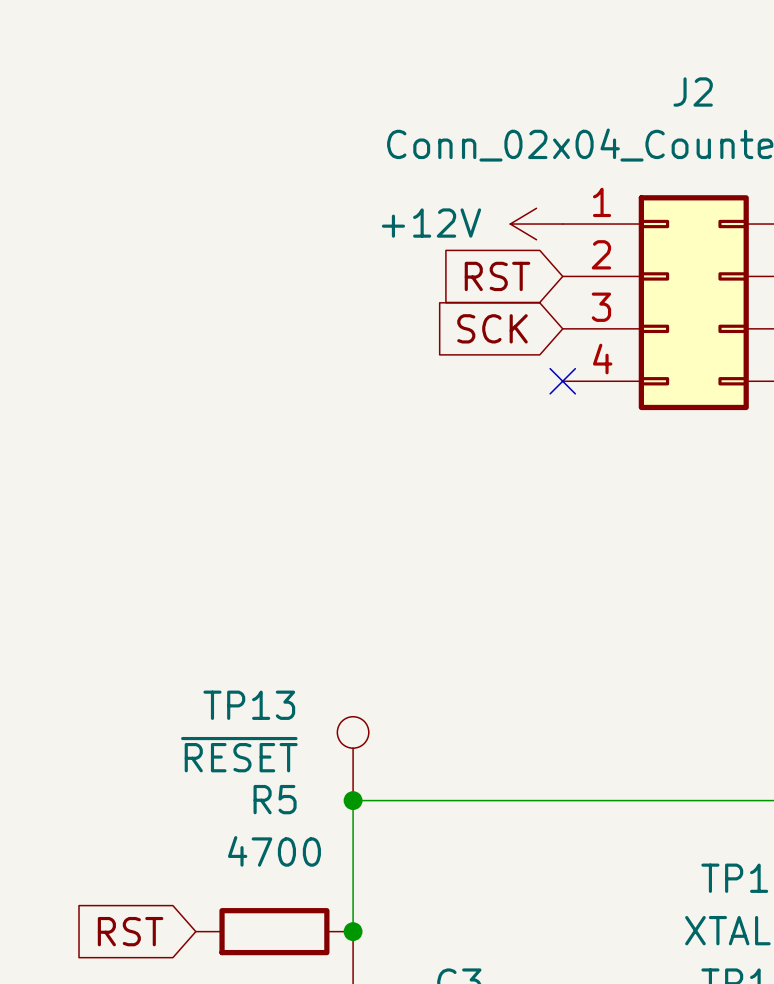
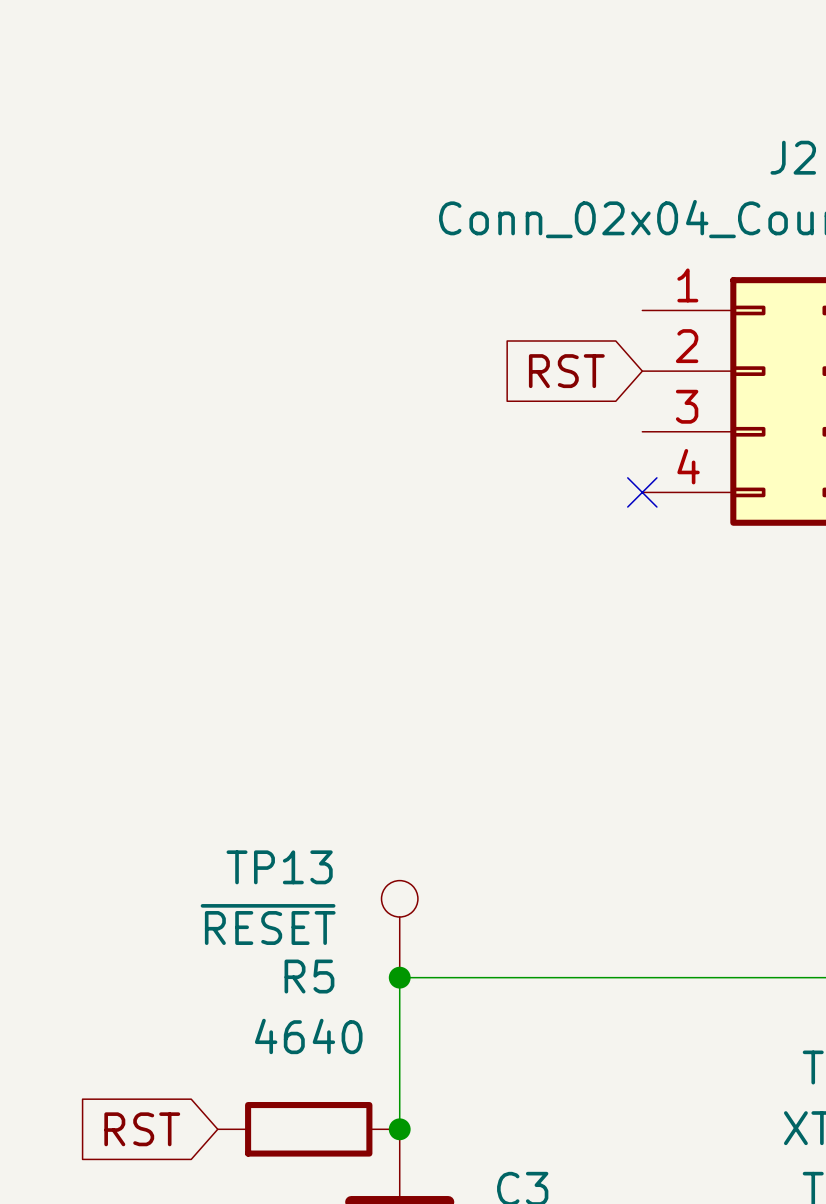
power symbol: +12V (536, 224) -> none
global label: SCK (492, 328) -> none
R5 value: 4700 (274, 851) -> 4640 (308, 1036)

